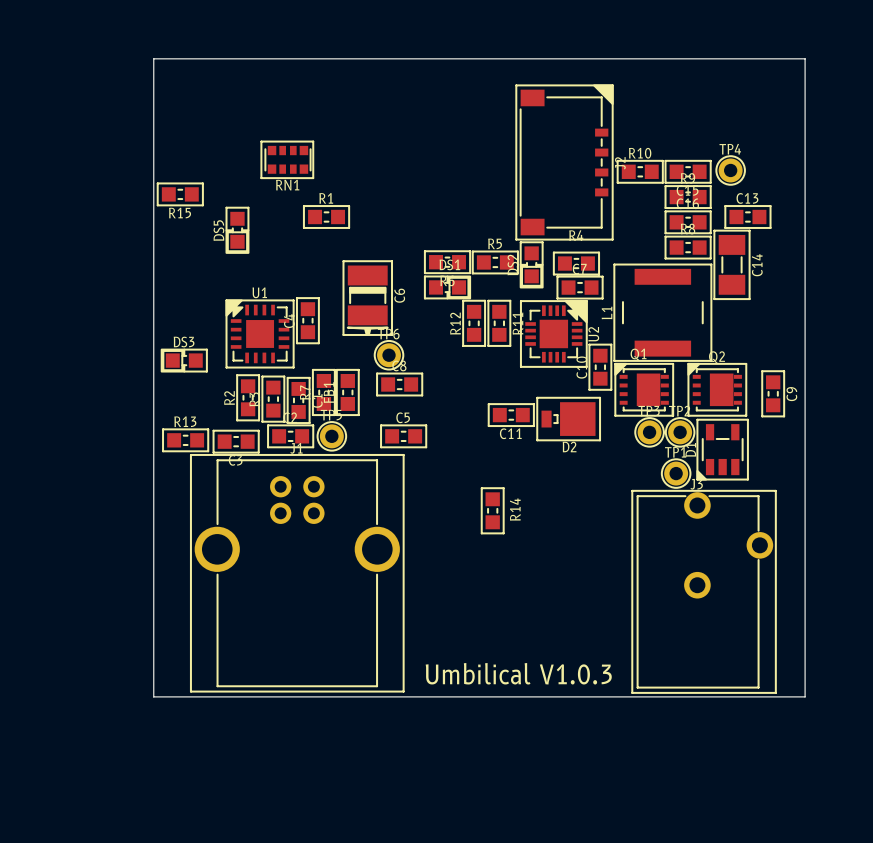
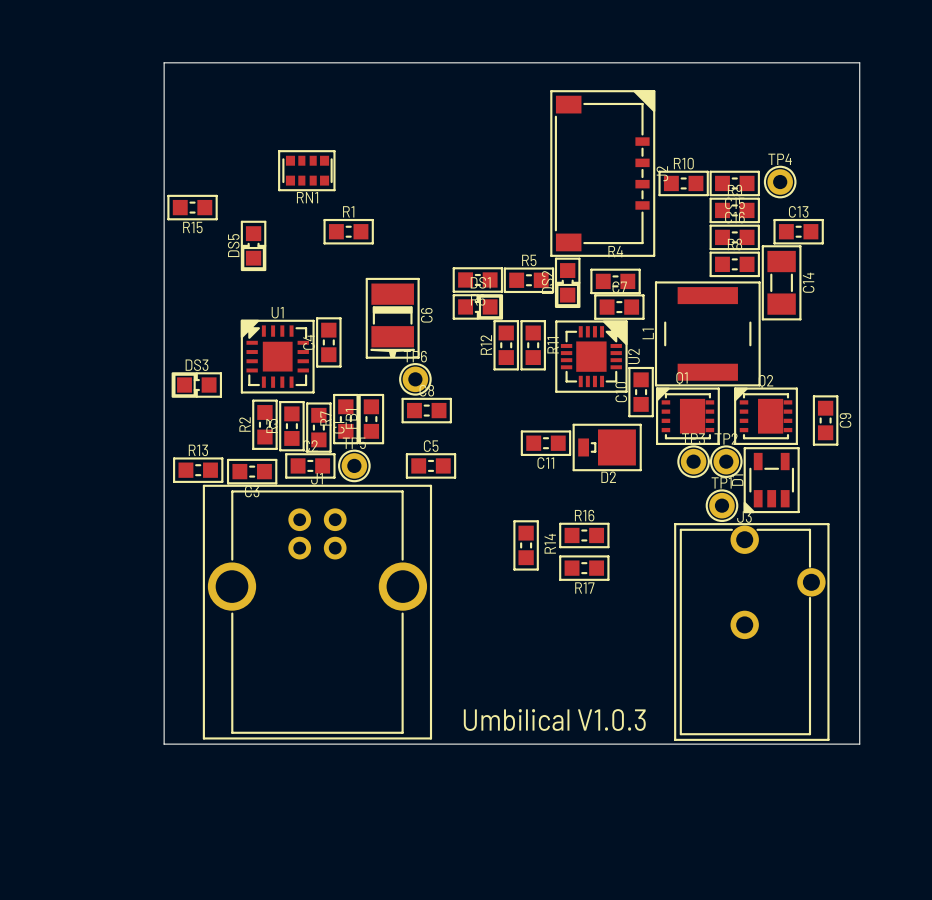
R16: none -> (584, 535)
R17: none -> (584, 568)

